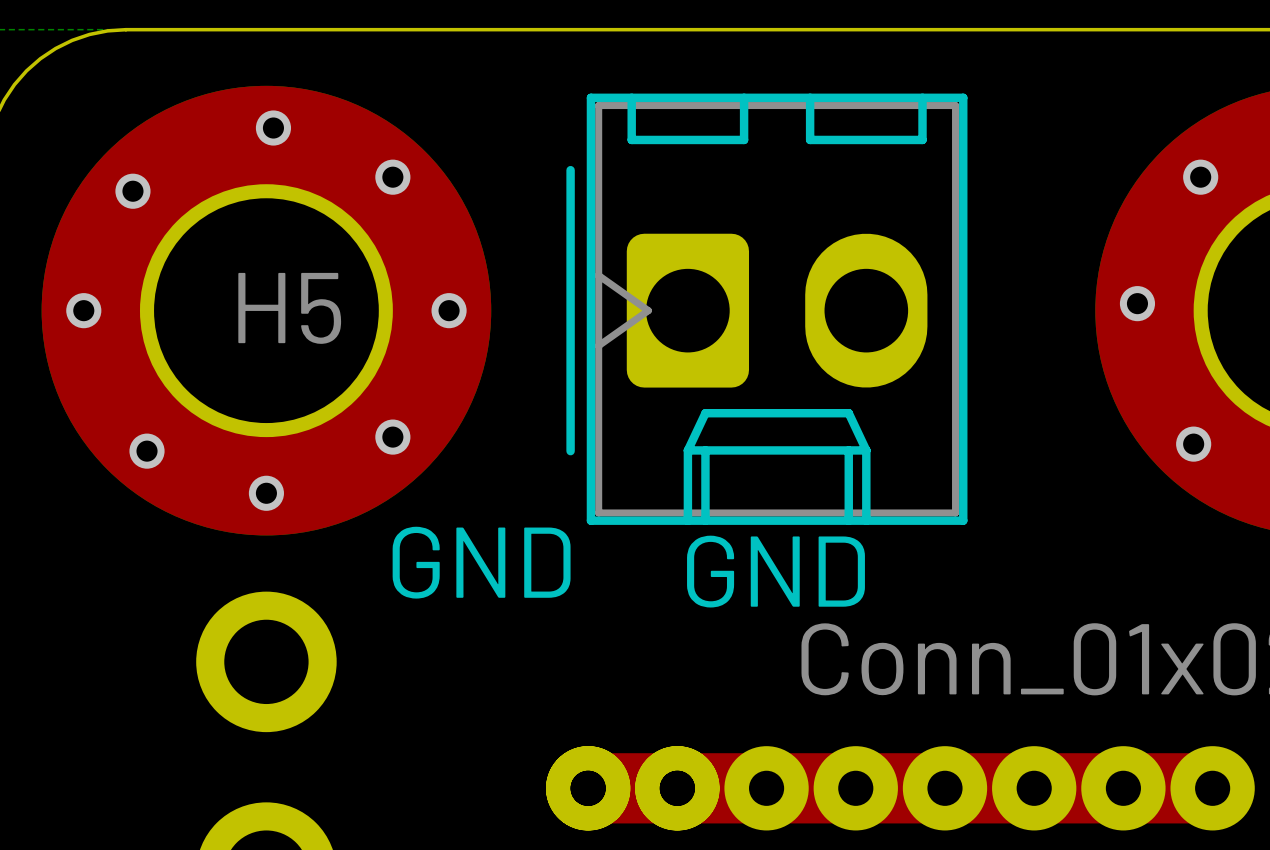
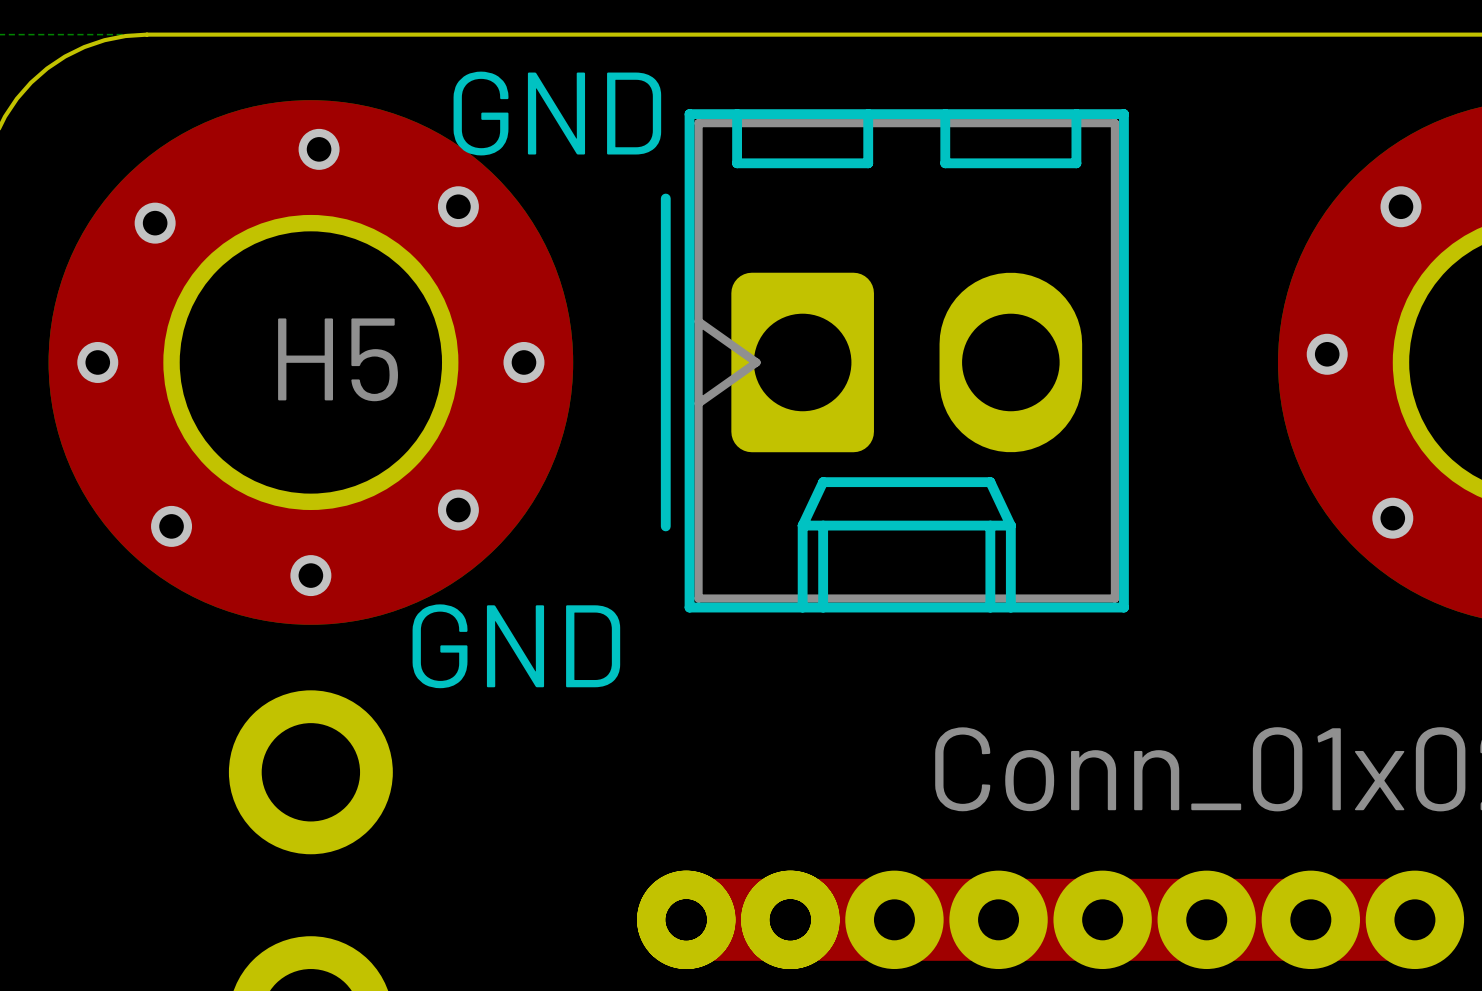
H5 value position: GND (481, 562) -> GND (516, 646)
GND name position: GND (775, 571) -> GND (557, 113)

